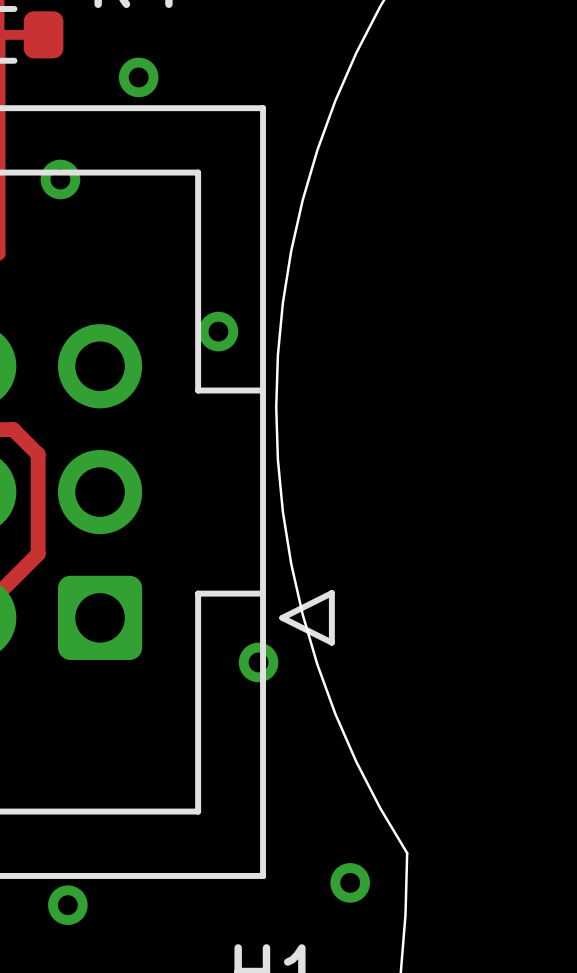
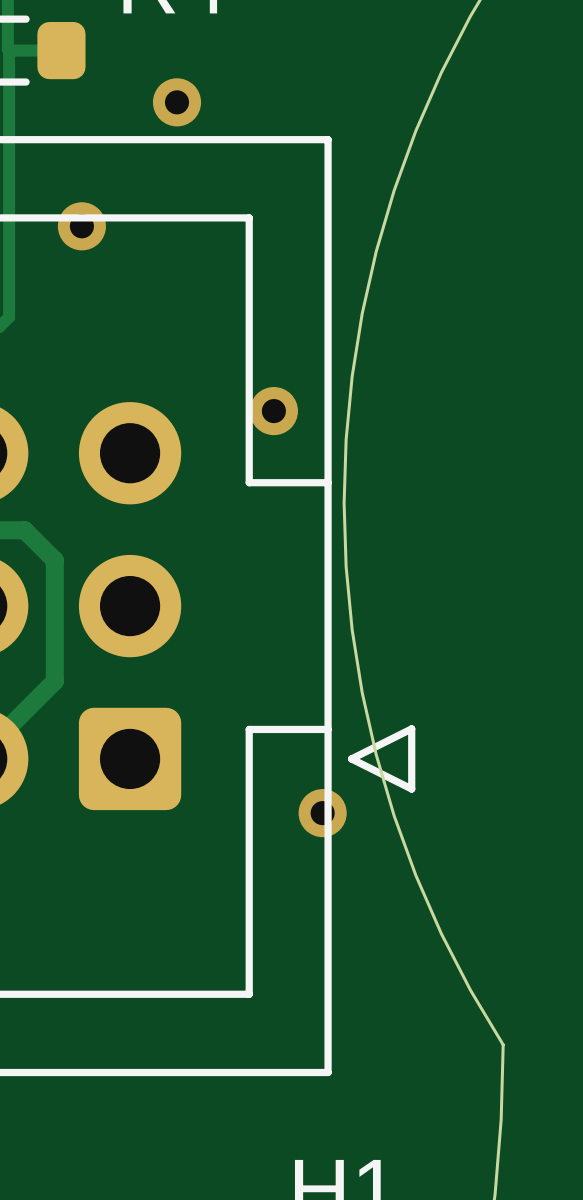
via: (350, 882) -> none
via: (67, 905) -> none

